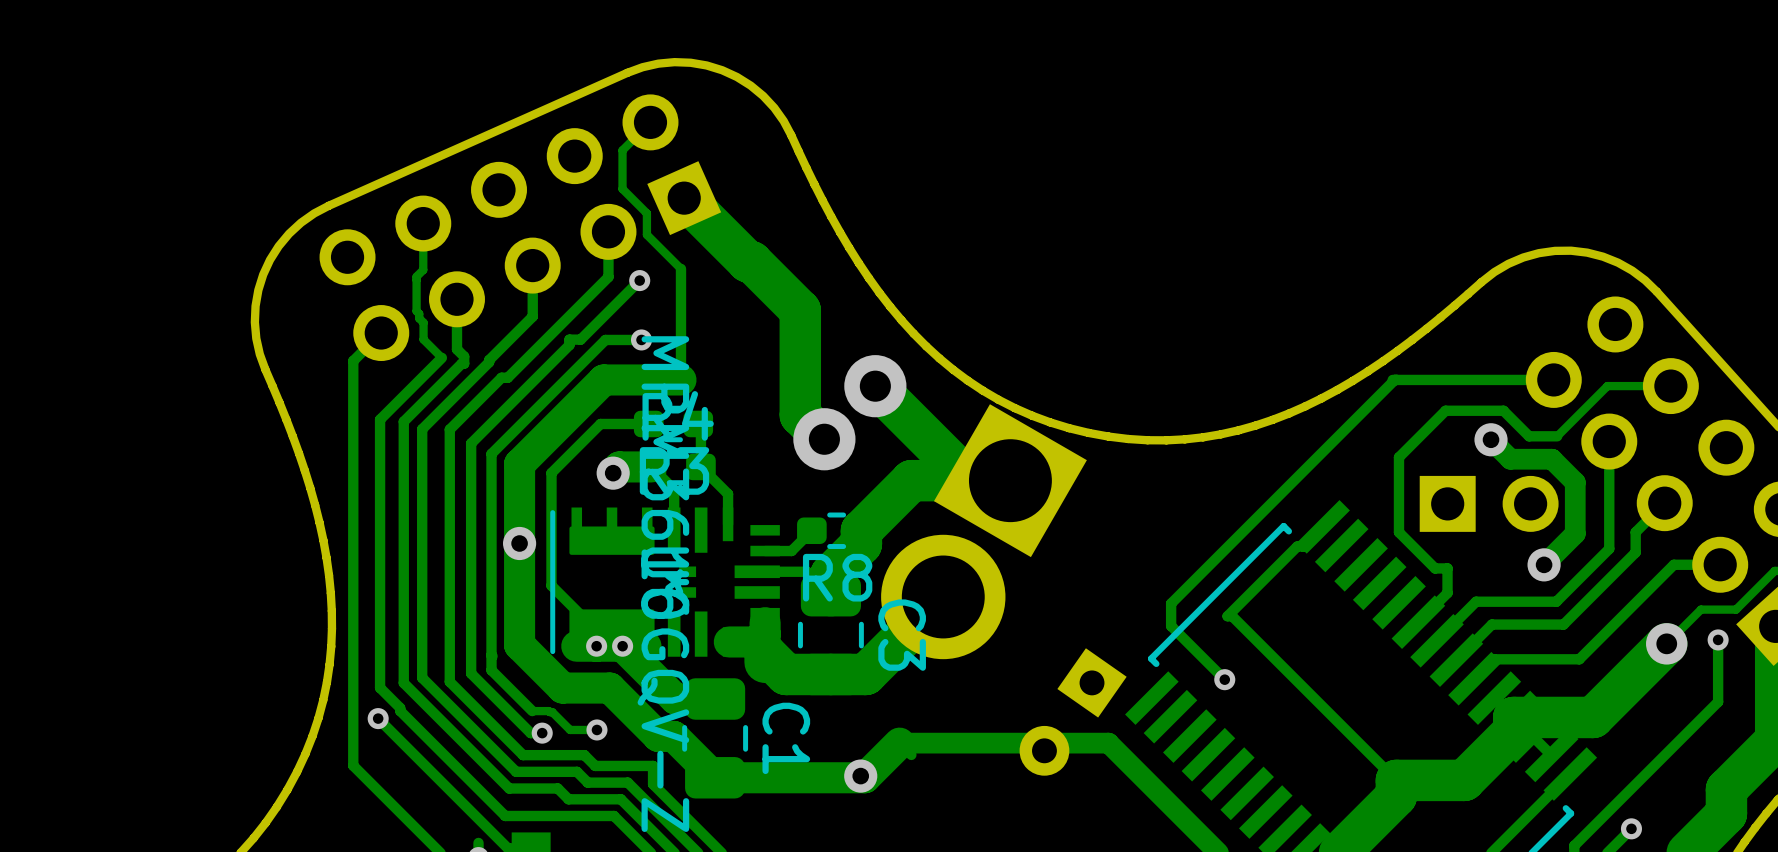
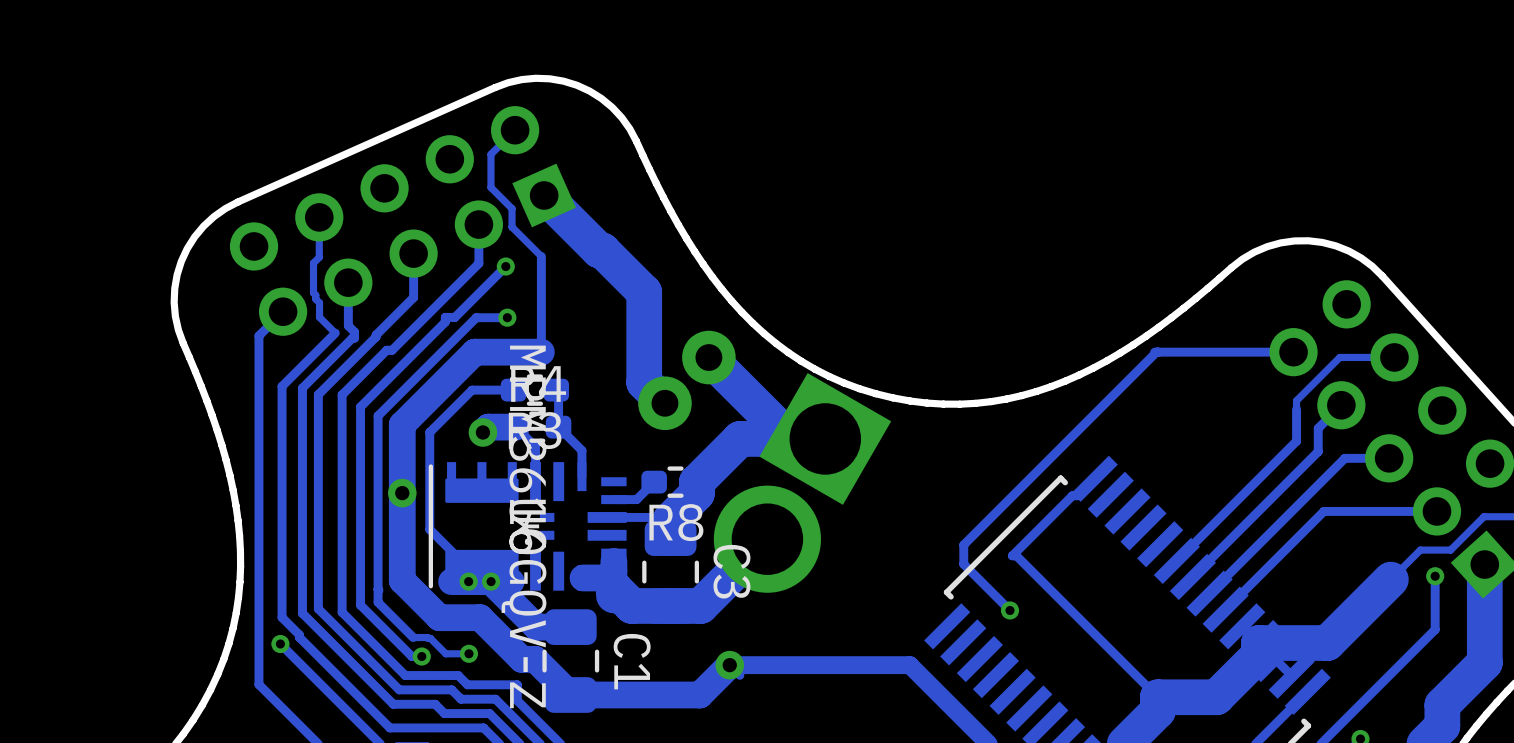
track: (1557, 436) (1529, 436) (1503, 410) (1445, 410) (1398, 457) (1398, 532) (1435, 568) (1447, 568) (1447, 593) -> (1296, 400) (1296, 441) (1201, 535)
track: (1491, 439) (1510, 459) (1552, 459) (1575, 482) (1575, 533) (1544, 564) -> none
via: (1491, 439) -> none
track: (1609, 441) (1609, 548) (1556, 601) (1476, 601) -> (1341, 405) (1318, 428) (1318, 451) (1226, 543)
part: (1489, 503) -> none
track: (1664, 503) (1635, 532) (1635, 552) (1563, 624) (1491, 624) -> (1389, 458) (1344, 458) (1240, 562)
via: (1544, 564) -> none
track: (1673, 564) (1579, 659) (1494, 659) -> (1397, 511) (1323, 511) (1242, 592)
via: (1666, 643) -> none
part: (1073, 711) -> none
via position: (860, 776) -> (729, 665)

